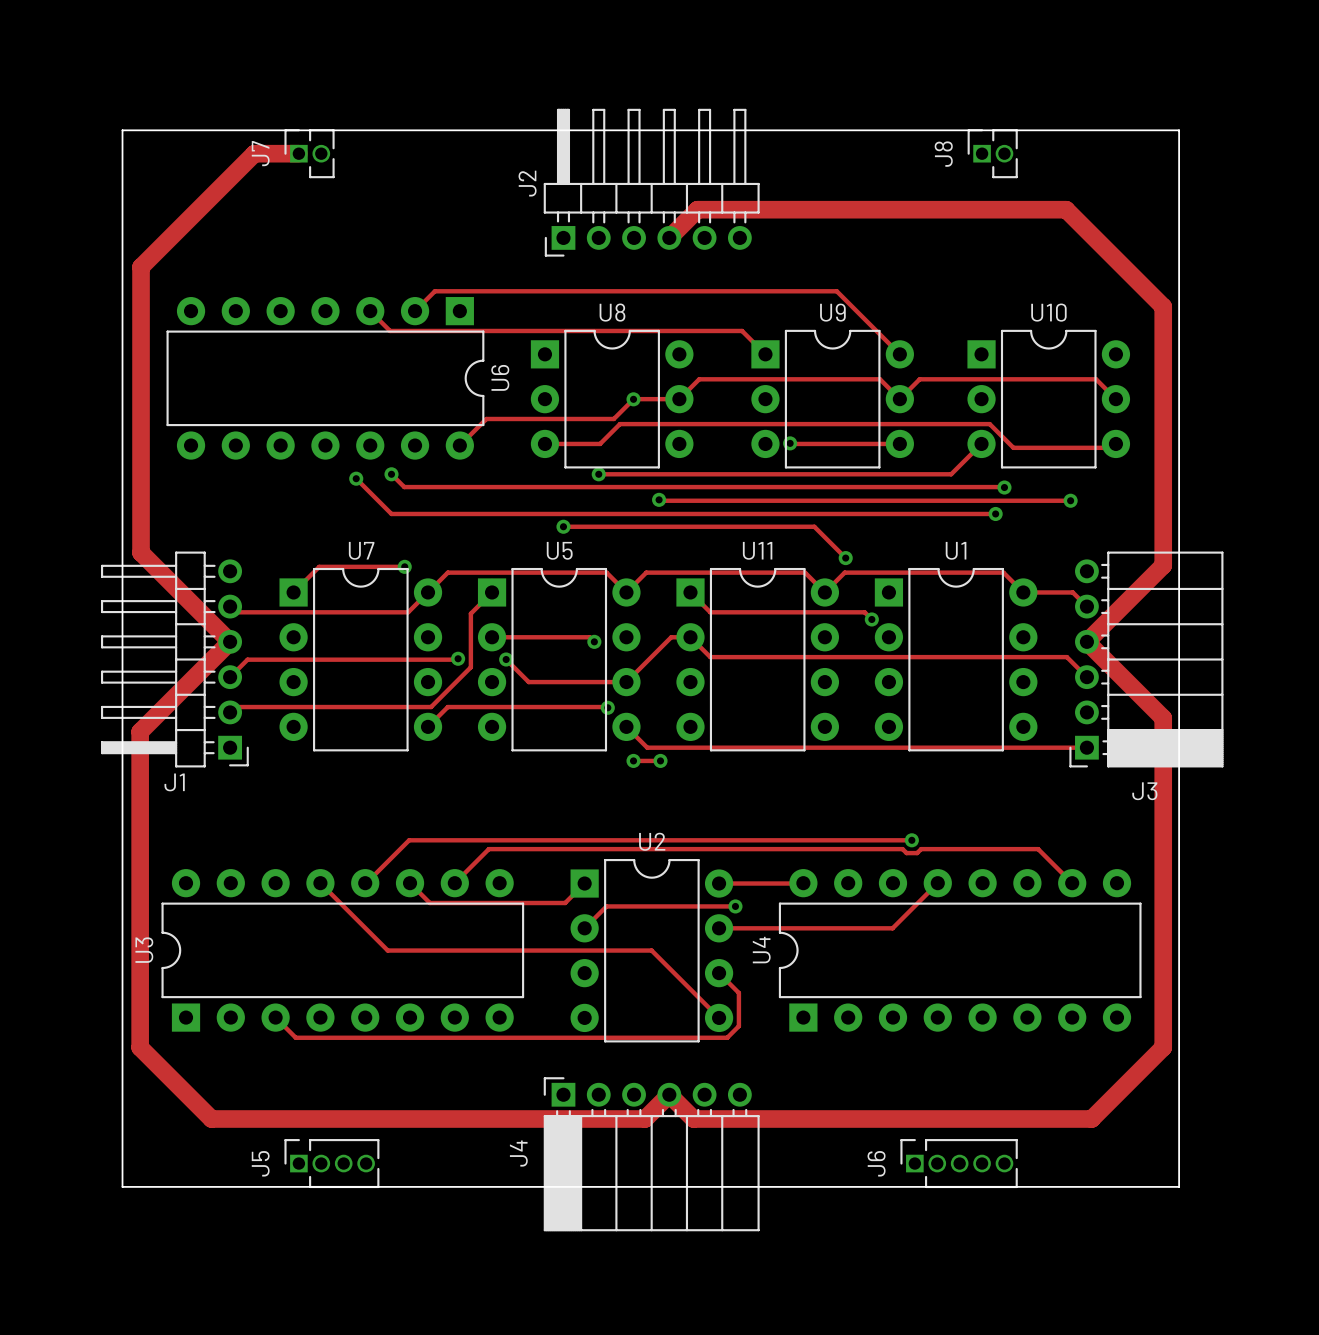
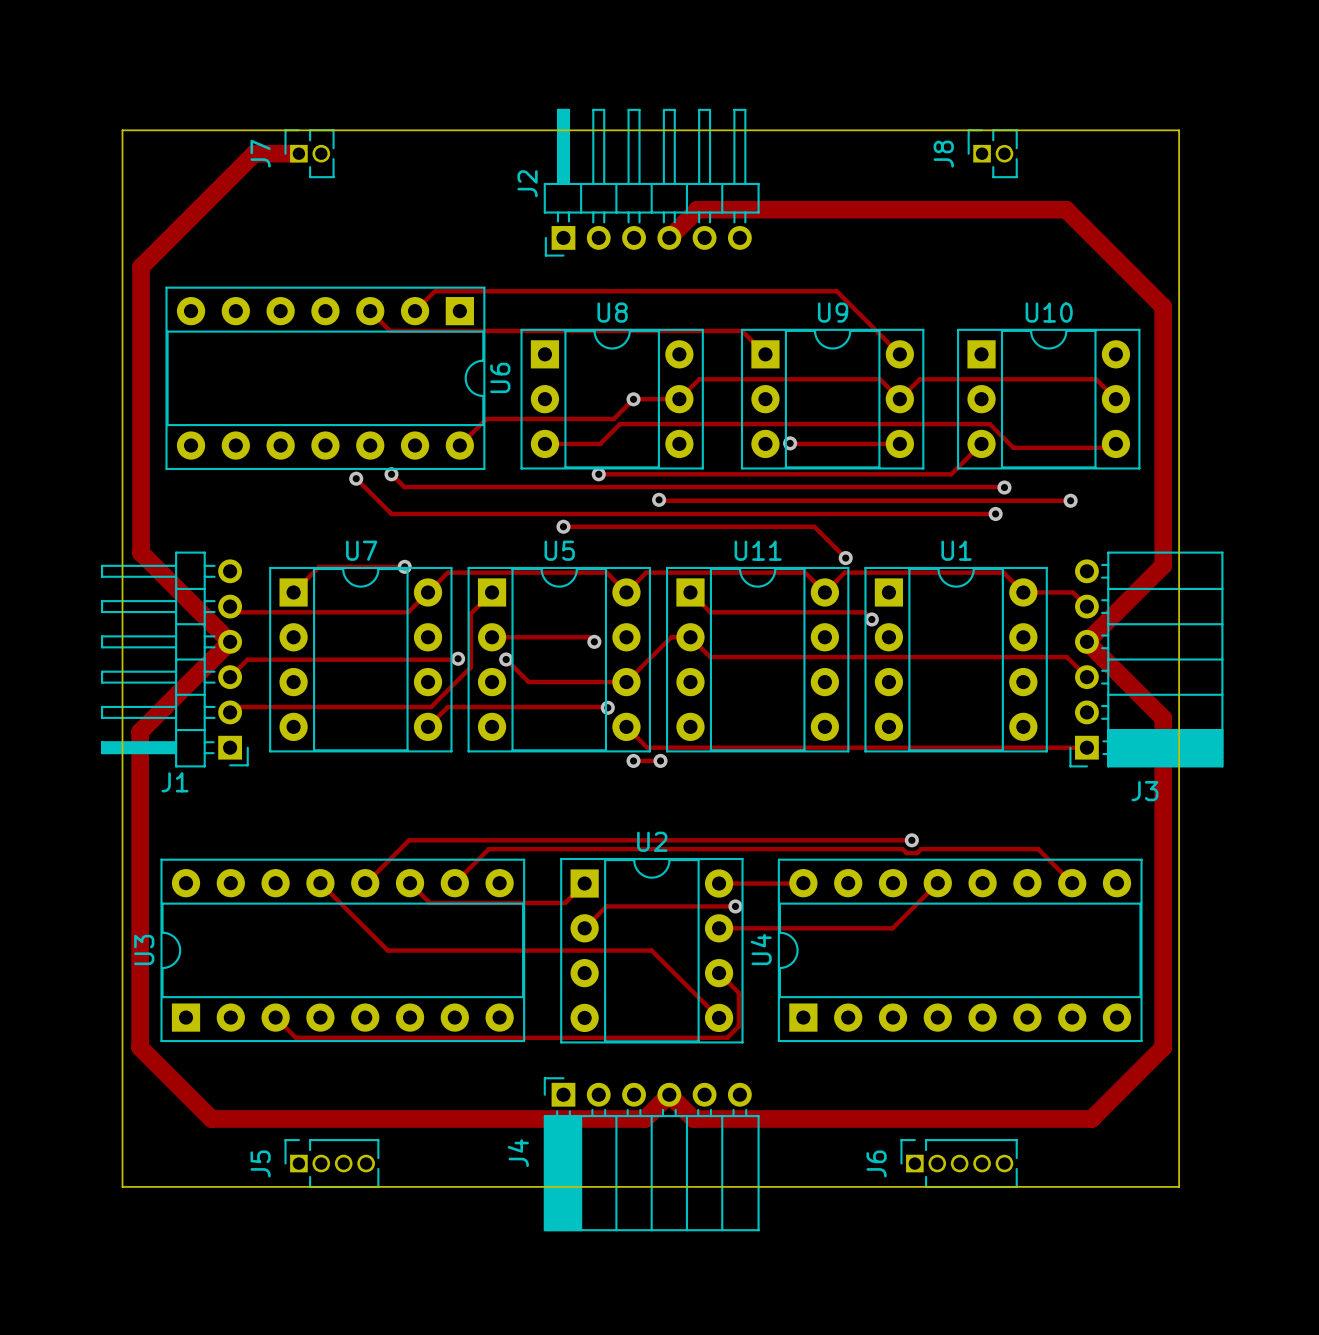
U6 footprint: [166, 297, 485, 460] -> [165, 286, 486, 471]
U8 footprint: [530, 329, 694, 469] -> [520, 328, 704, 470]
U9 footprint: [751, 329, 914, 469] -> [740, 328, 925, 470]
U10 footprint: [967, 329, 1131, 469] -> [957, 328, 1141, 470]
U7 footprint: [279, 567, 443, 752] -> [269, 566, 453, 753]
U5 footprint: [477, 567, 641, 752] -> [467, 566, 651, 753]
U11 footprint: [676, 567, 840, 752] -> [665, 566, 850, 753]
U1 footprint: [874, 567, 1038, 752] -> [864, 566, 1048, 753]
U2 footprint: [570, 859, 734, 1043] -> [560, 857, 744, 1044]
U3 footprint: [161, 869, 525, 1032] -> [160, 858, 526, 1043]
U4 footprint: [778, 869, 1142, 1032] -> [777, 858, 1143, 1043]

